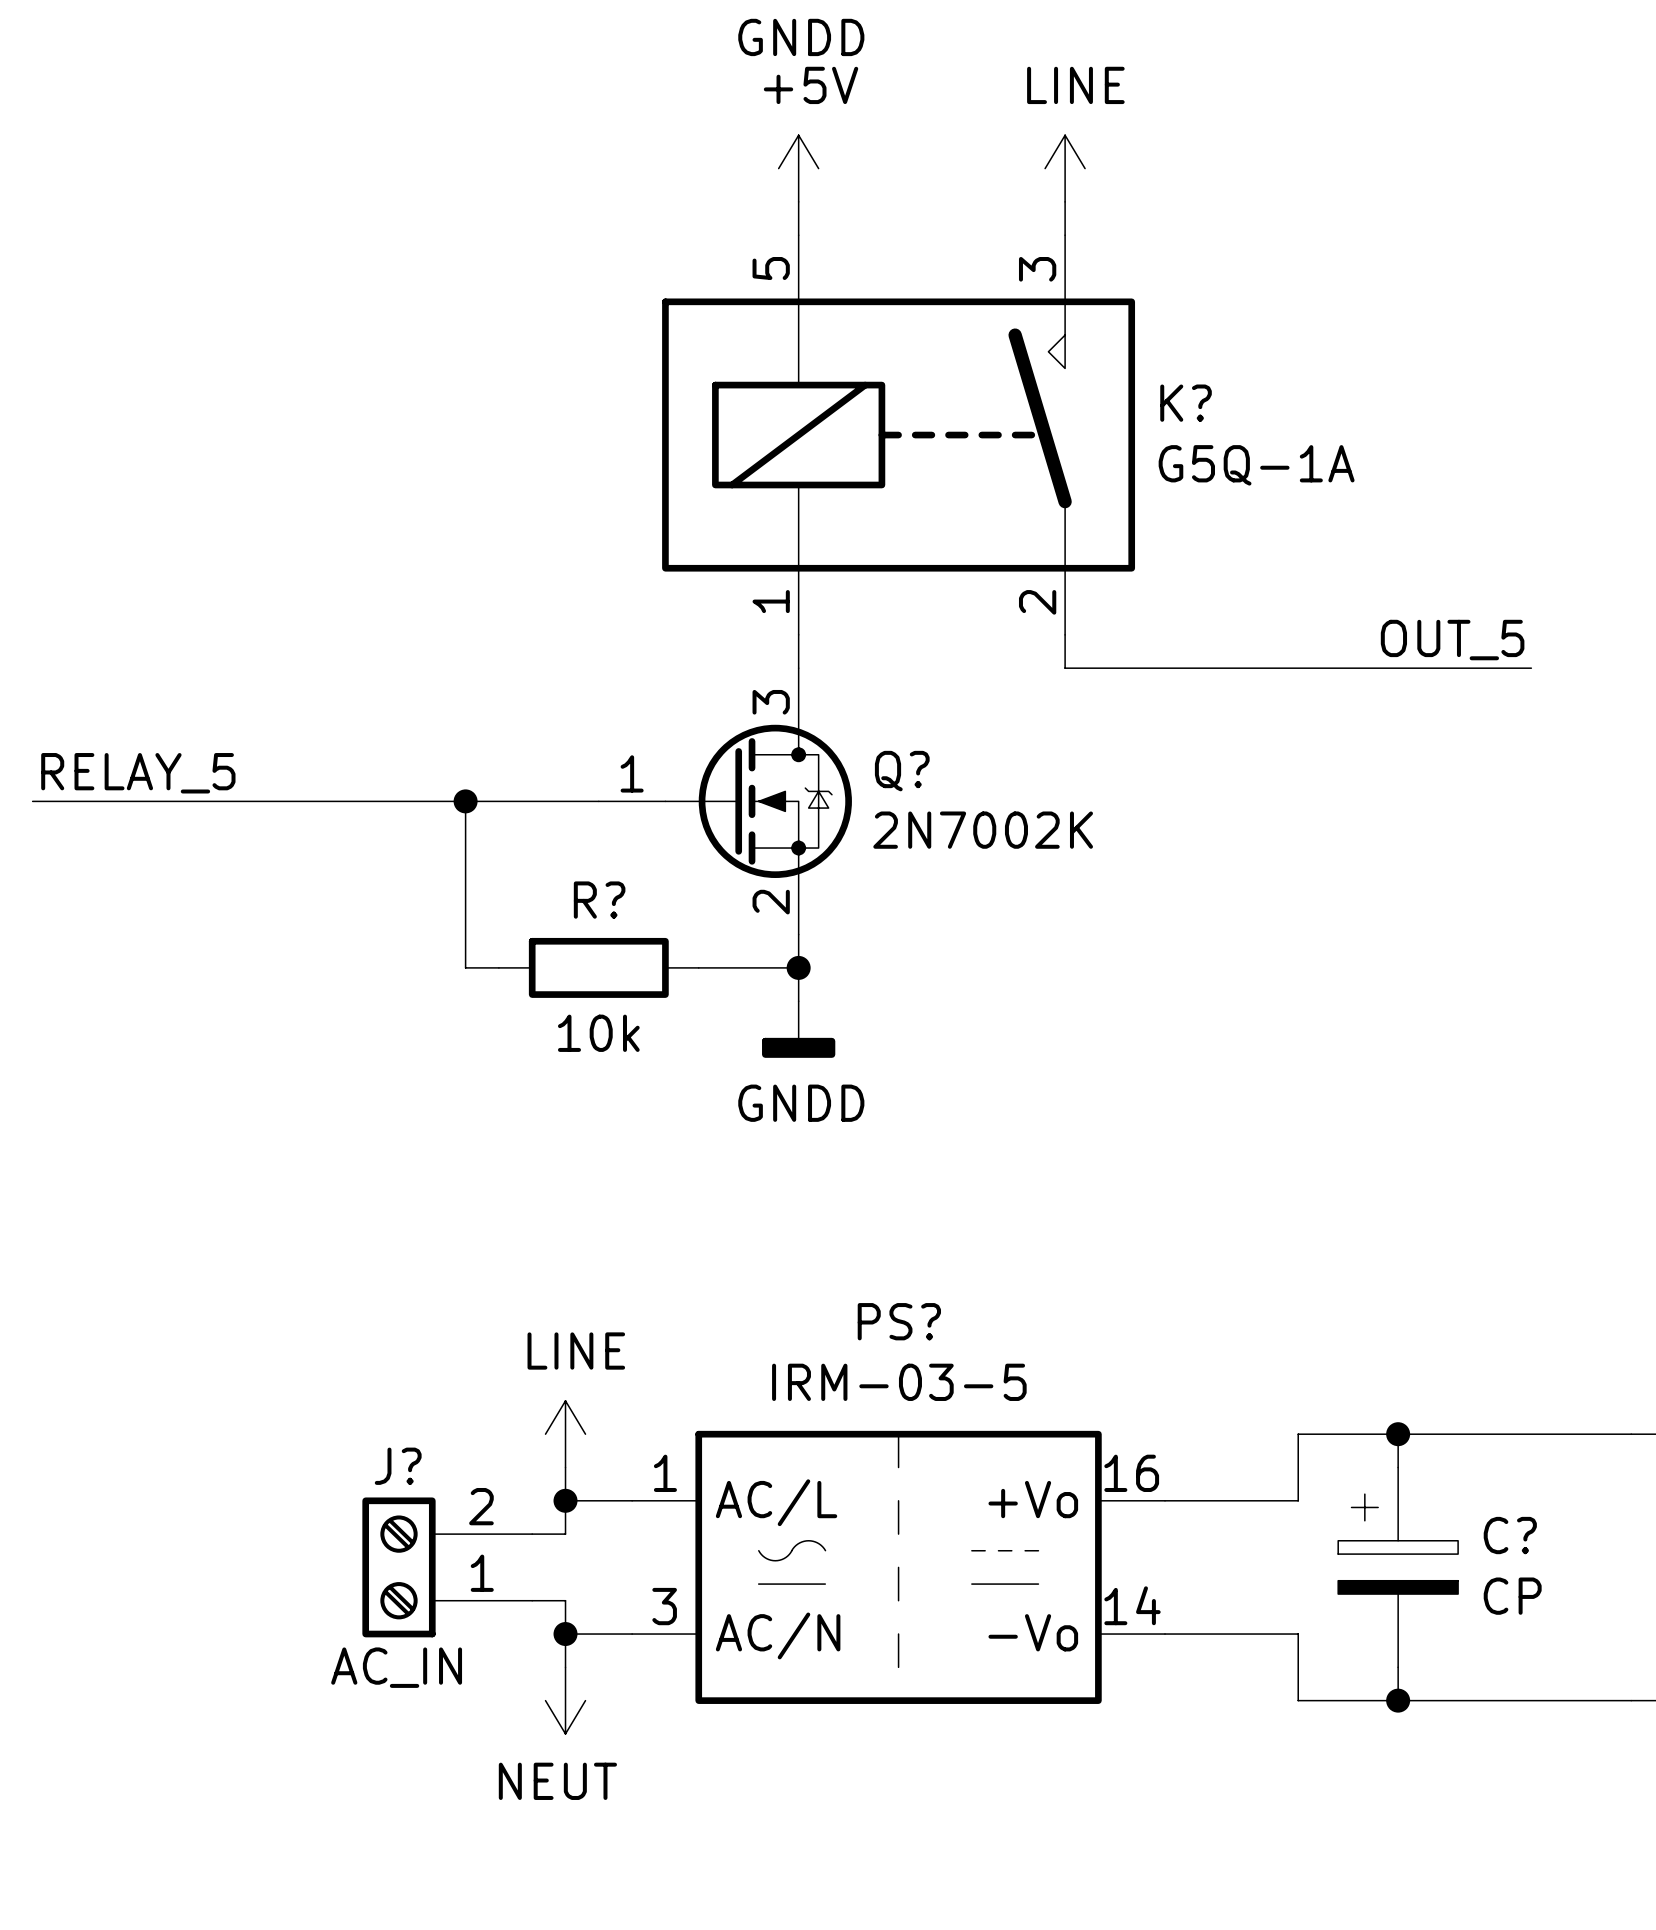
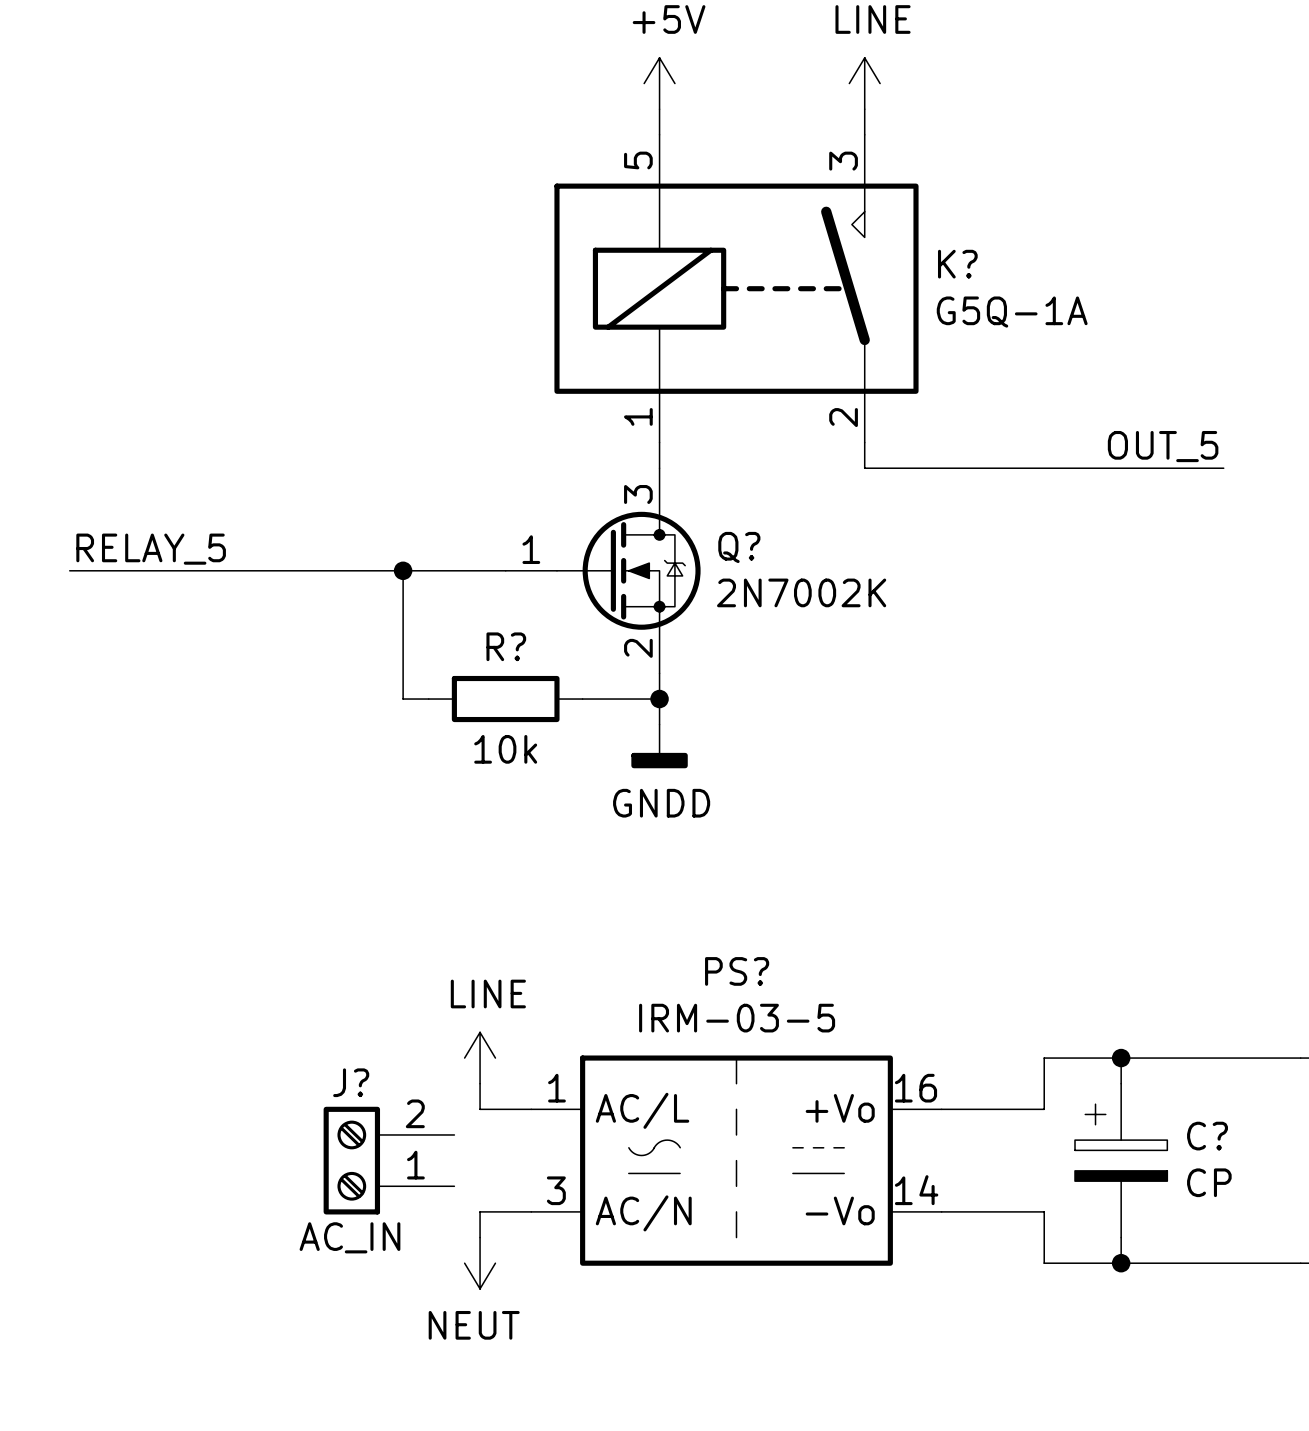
wire: (565, 1500) (565, 1534) (532, 1534) -> none
junction: (565, 1500) -> none
wire: (532, 1600) (565, 1600) (565, 1634) -> none
junction: (565, 1634) -> none

